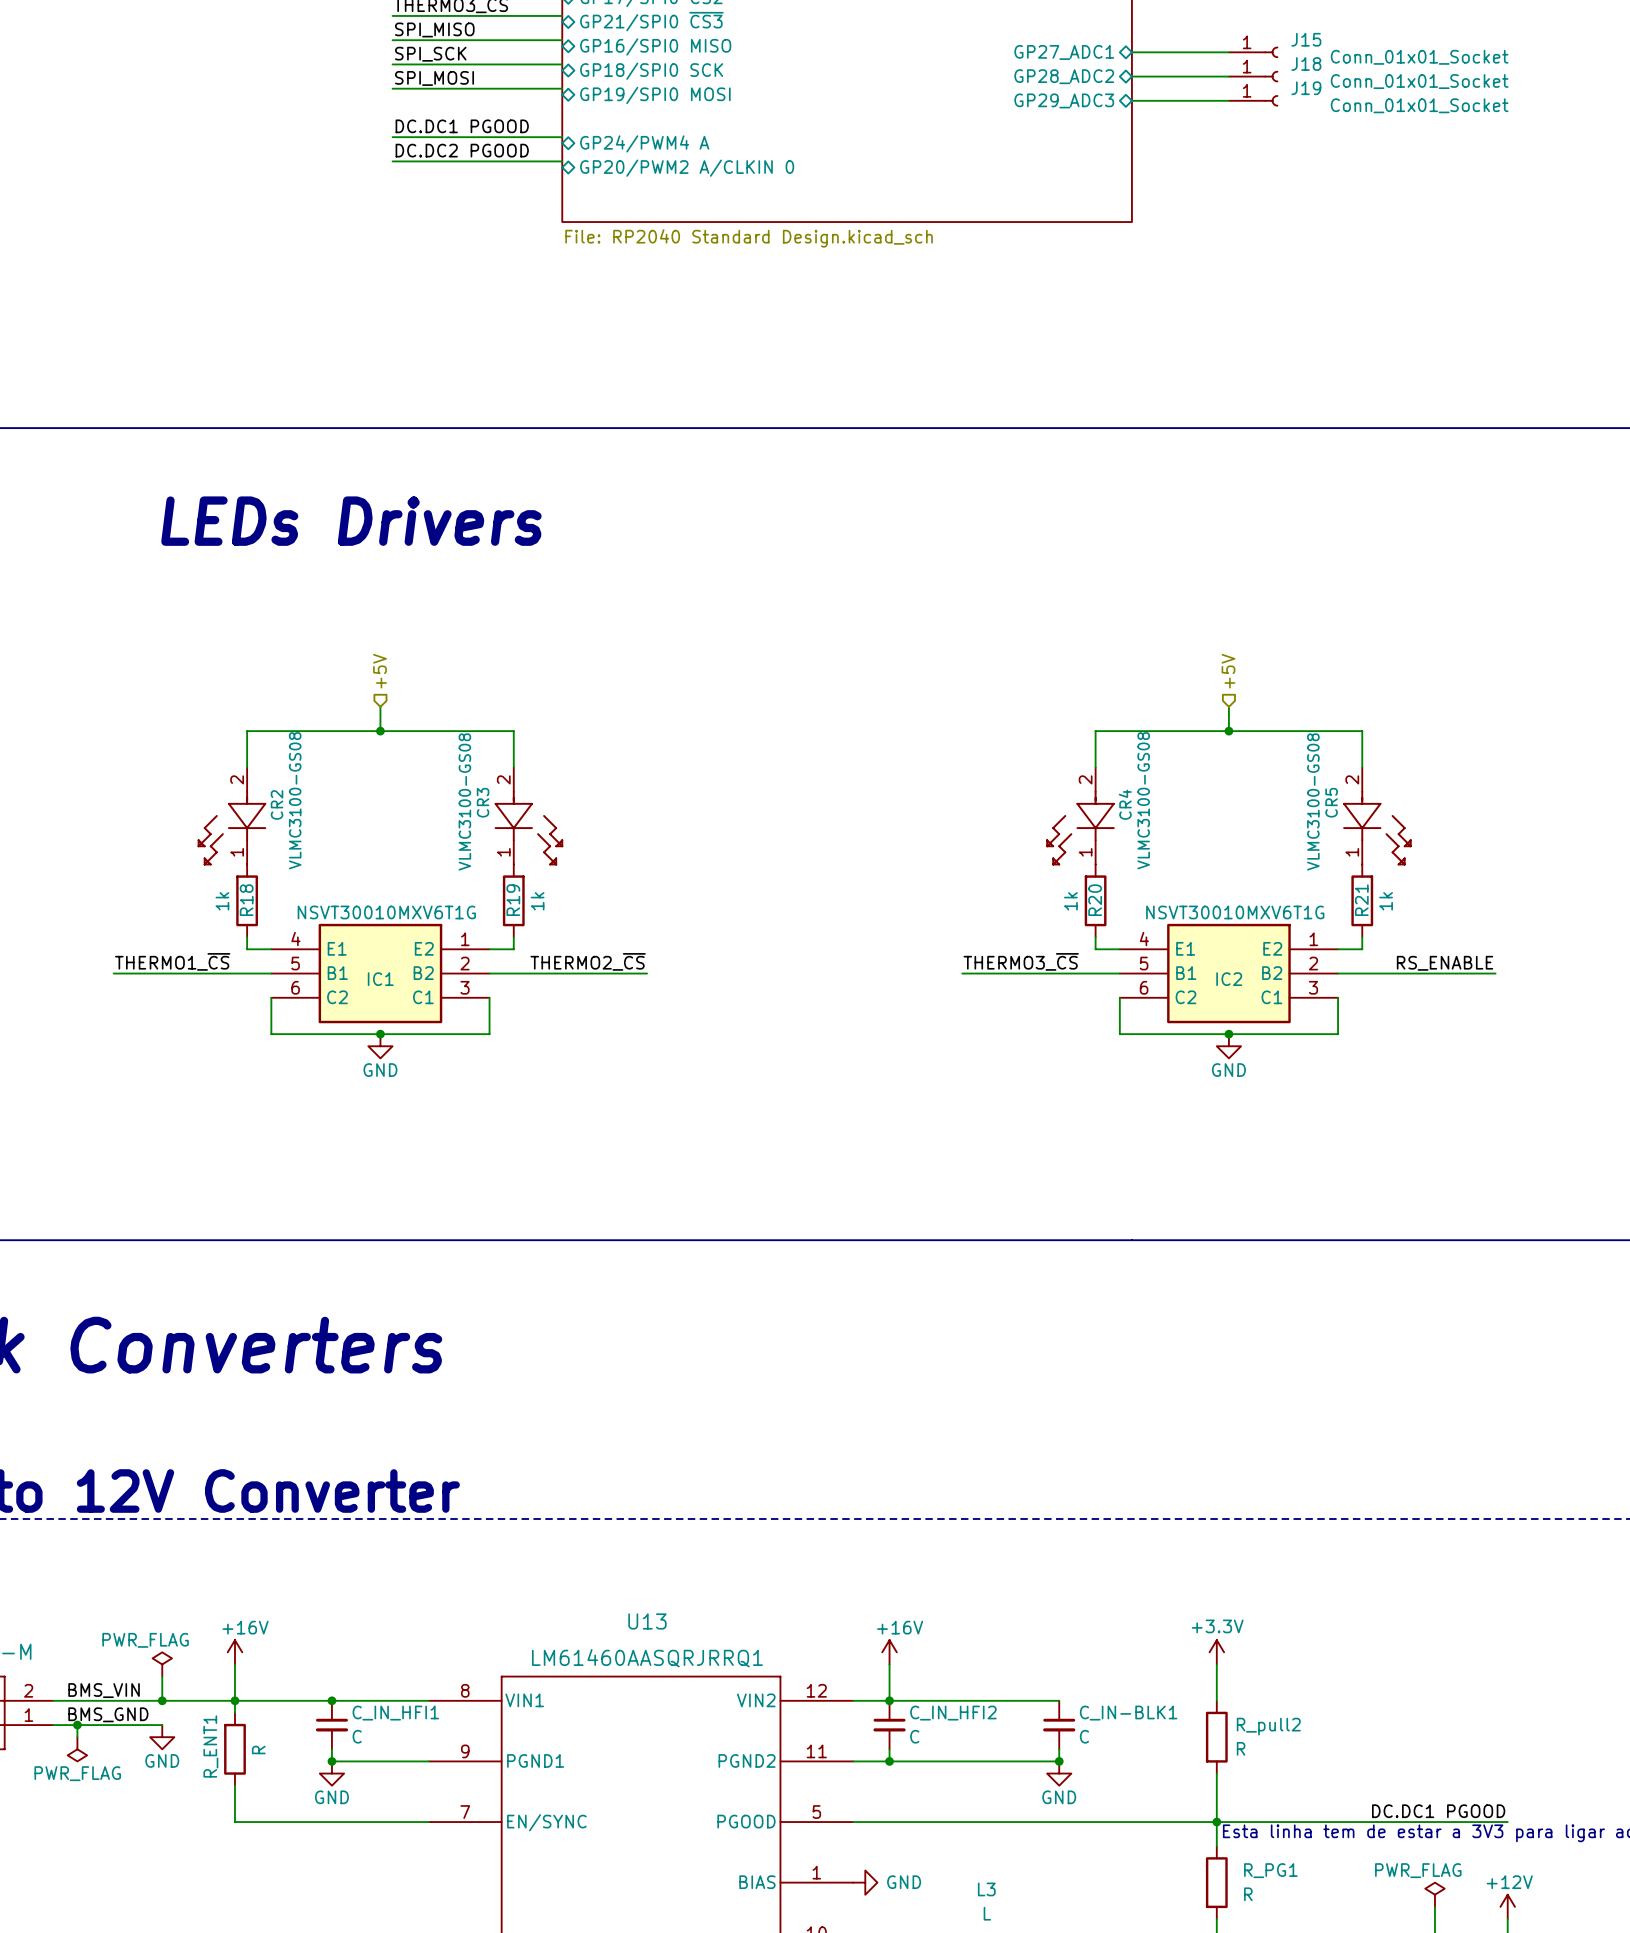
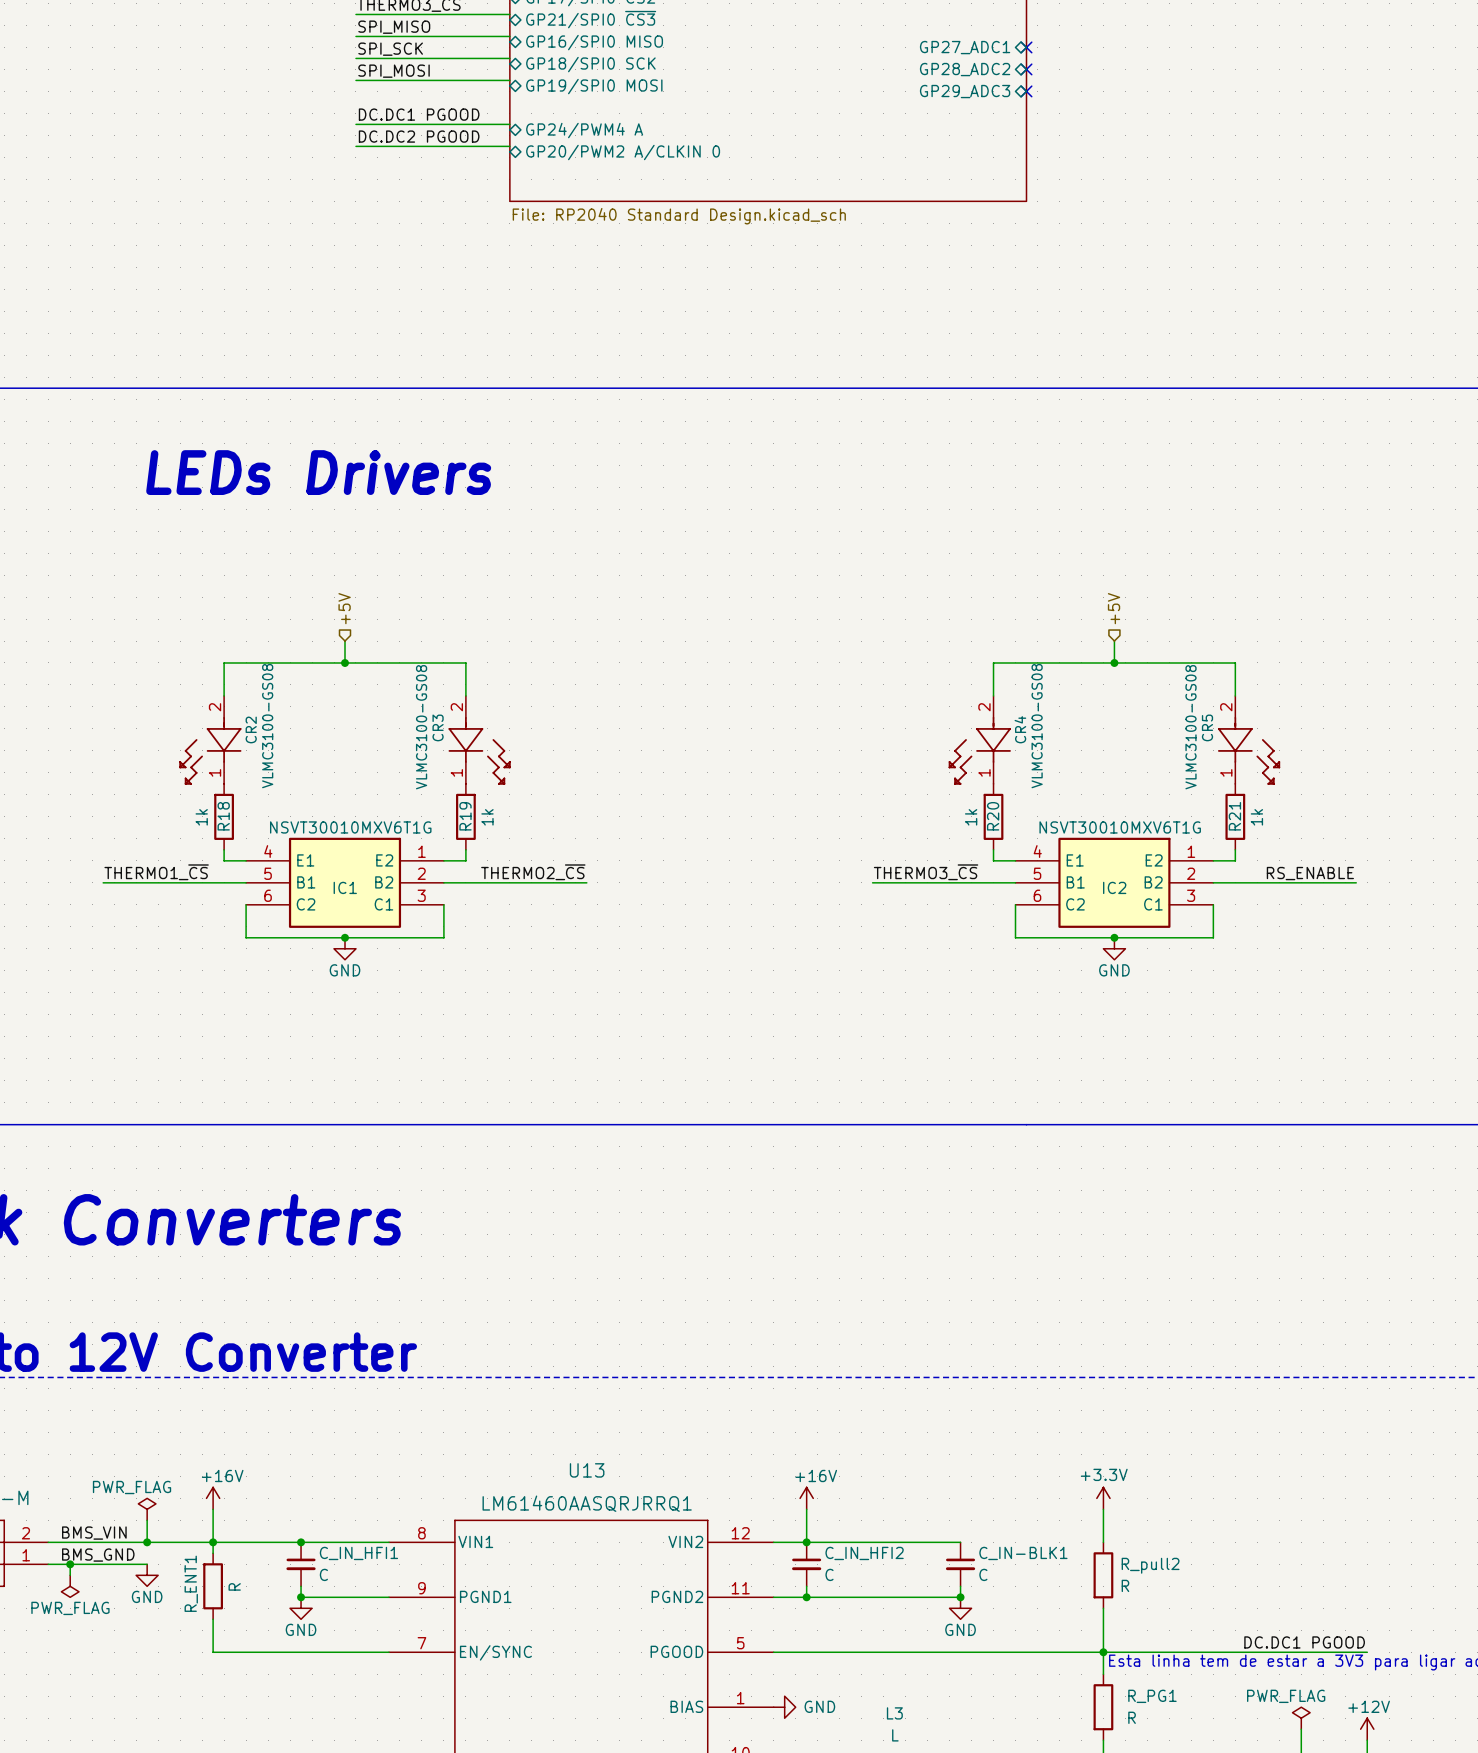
wire: (1131, 52) (1228, 52) -> none
no-connect mark: none -> (1026, 47)
J15: Conn_01x01_Socket (1253, 52) -> none
wire: (1131, 76) (1228, 76) -> none
no-connect mark: none -> (1026, 69)
J18: Conn_01x01_Socket (1253, 76) -> none
wire: (1131, 100) (1228, 100) -> none
no-connect mark: none -> (1026, 91)
J19: Conn_01x01_Socket (1253, 100) -> none

